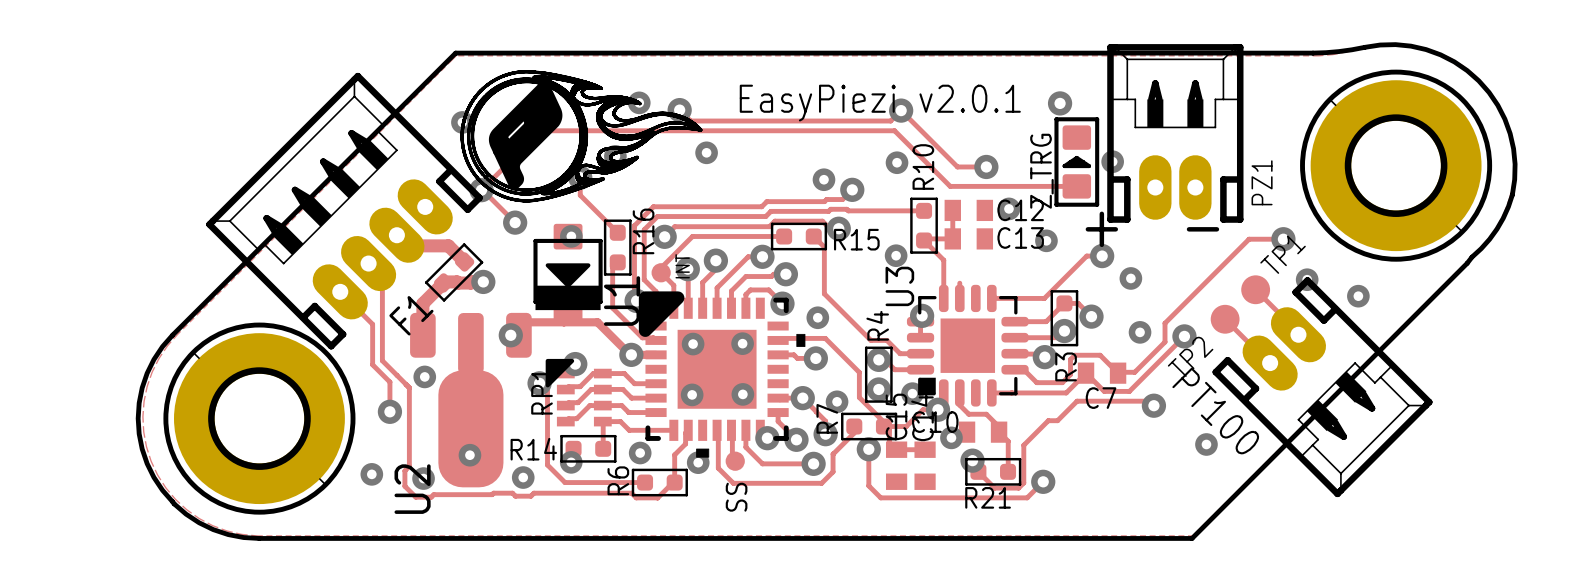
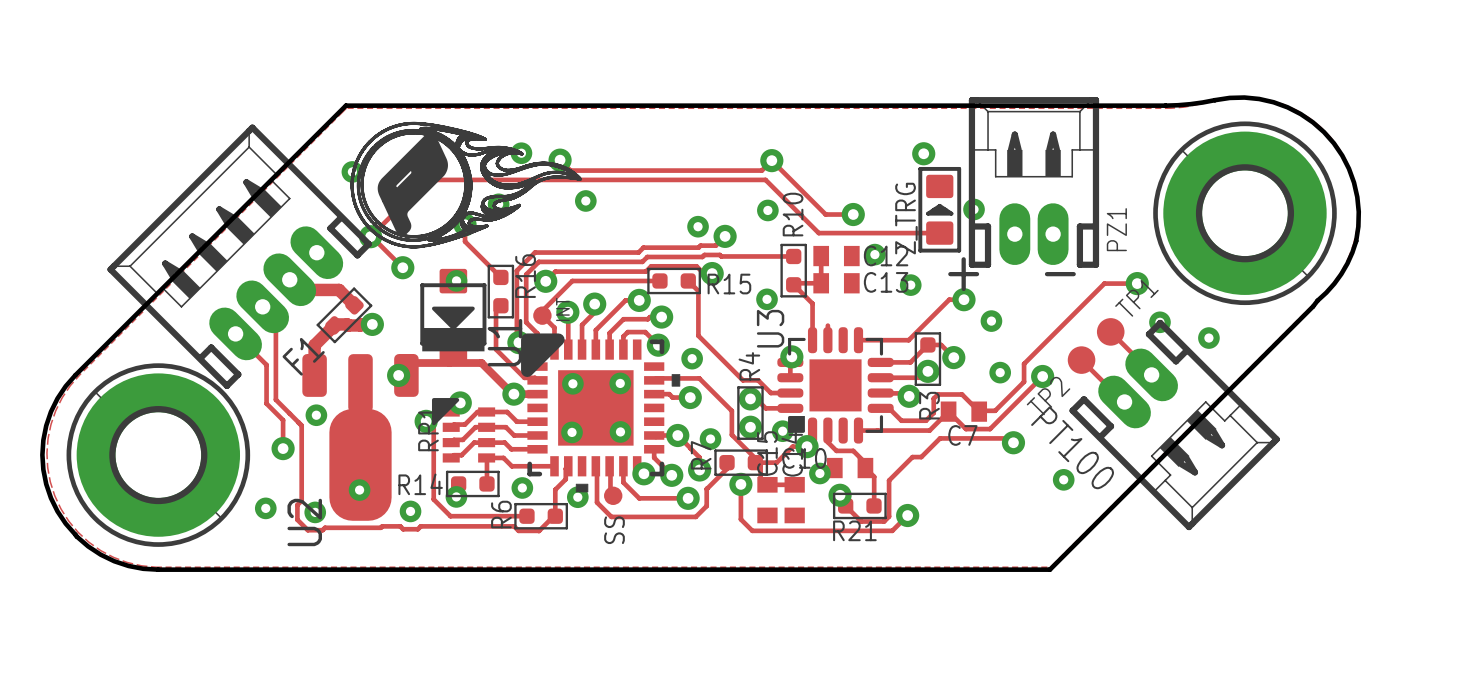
text: EasyPiezi v2.0.1 (880, 103) -> none

